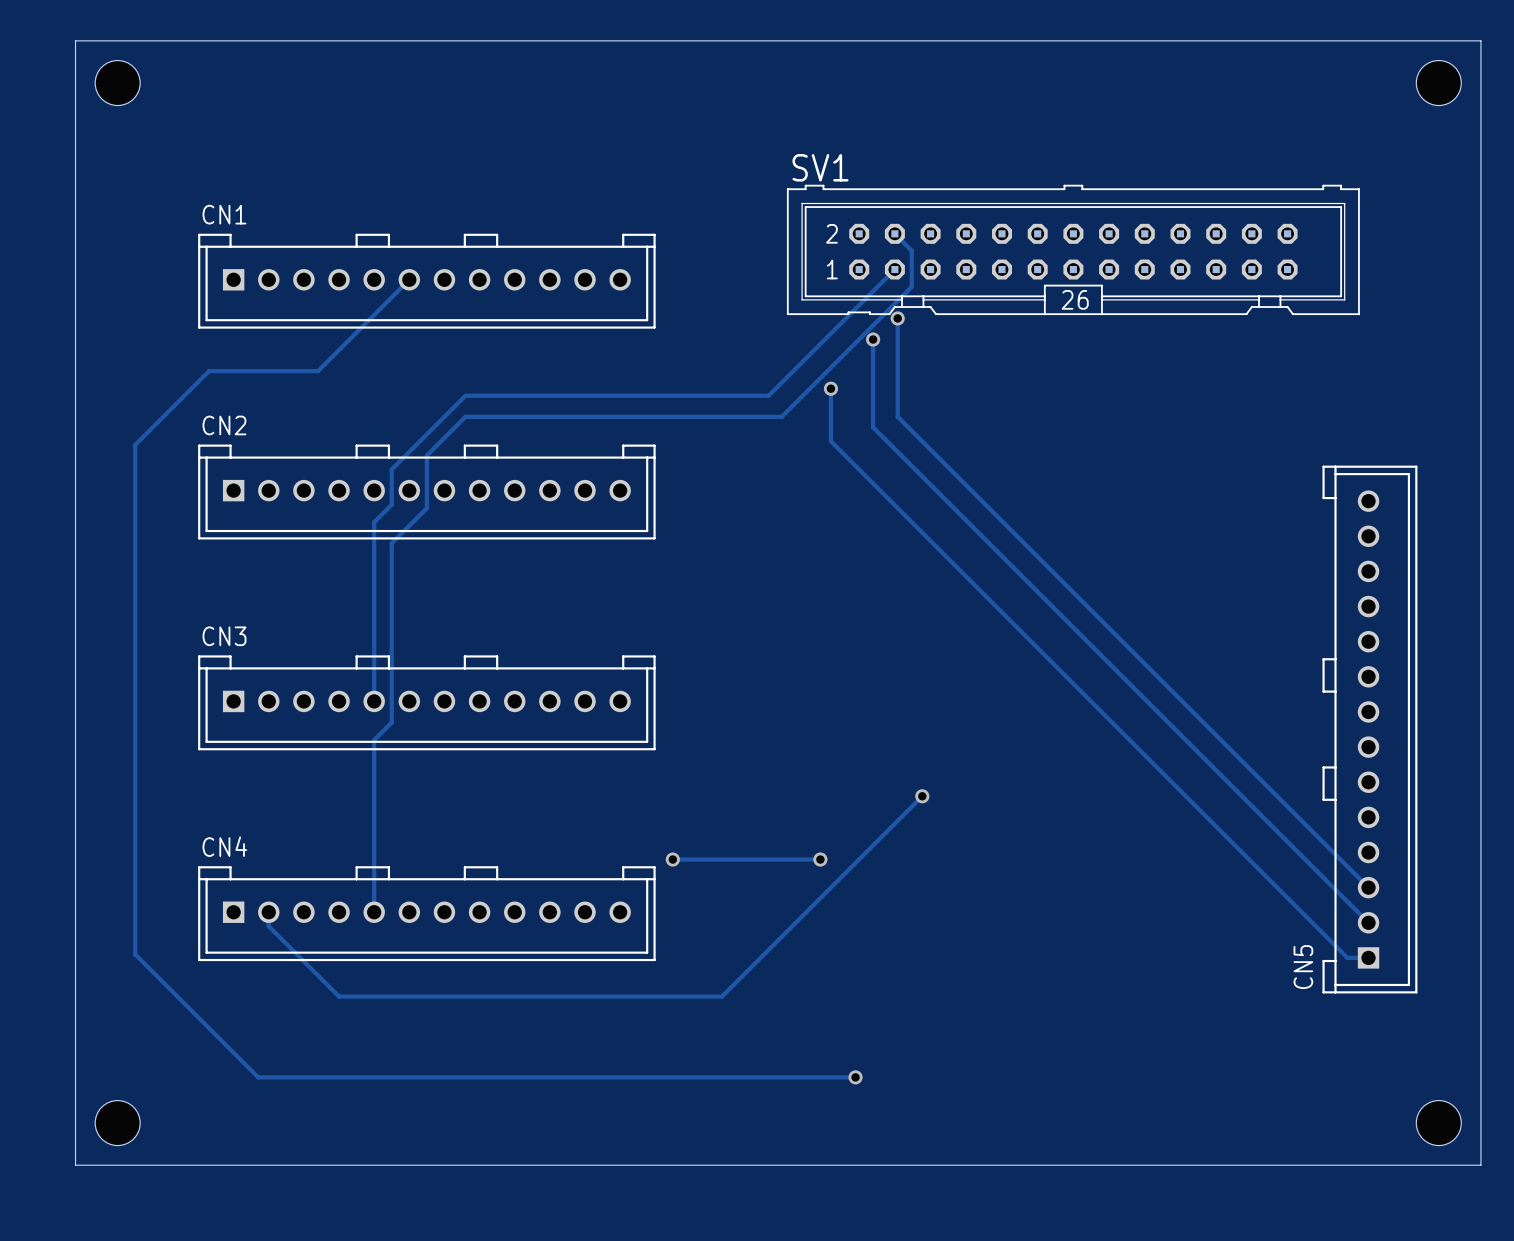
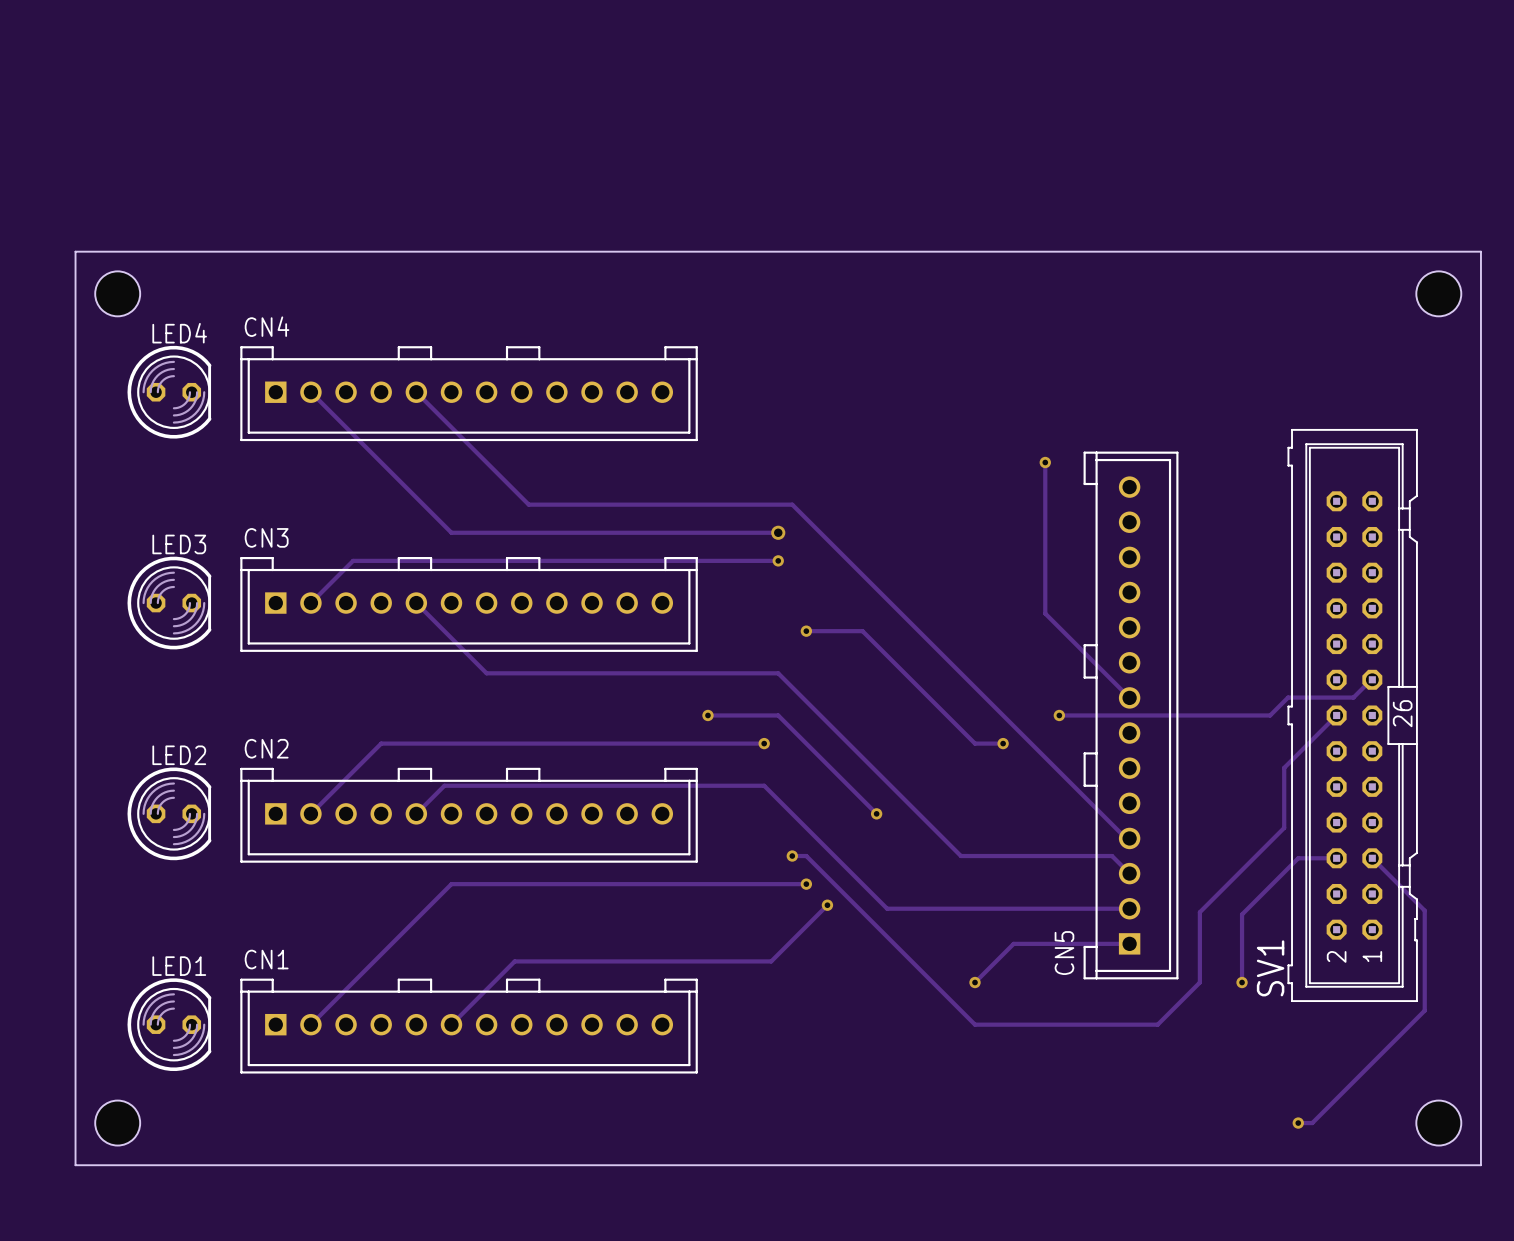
hole position: (117, 83) -> (117, 293)
hole position: (1438, 83) -> (1438, 293)
track: (894, 233) (911, 250) (911, 286) (781, 416) (465, 416) (426, 455) (426, 508) (391, 543) (391, 722) (374, 740) (374, 912) -> none
SV1 rotation: 0° (1073, 249) -> 90° counterclockwise (1352, 715)
SV1 position: (1073, 249) -> (1352, 715)
board edge: (75, 251) (75, 40) (1480, 40) (1480, 251) -> (75, 251) (1480, 251)
track: (894, 269) (768, 395) (465, 395) (391, 469) (391, 504) (374, 522) (374, 701) -> none
track: (409, 279) (317, 371) (209, 371) (135, 444) (135, 954) (258, 1077) (855, 1077) -> none
CN1 position: (426, 281) -> (469, 1026)
track: (897, 318) (897, 416) (1368, 887) -> none
via: (897, 318) -> none
track: (873, 339) (873, 427) (1368, 922) -> none
via: (873, 339) -> none
track: (830, 388) (830, 441) (1347, 957) (1368, 957) -> none
via: (830, 388) -> none
LED4: none -> (169, 392)
track: none -> (310, 392) (451, 532) (778, 532)
track: none -> (416, 392) (528, 504) (792, 504) (1126, 838) (1129, 838)
track: none -> (1045, 462) (1045, 613) (1129, 697)
via: none -> (1045, 462)
CN2 position: (426, 492) -> (469, 815)
via: none -> (778, 532)
track: none -> (778, 560) (353, 560) (310, 603)
via: none -> (778, 560)
LED3: none -> (169, 603)
track: none -> (416, 603) (486, 673) (778, 673) (960, 856) (1112, 856) (1129, 873)
track: none -> (806, 631) (862, 631) (975, 743) (1003, 743)
via: none -> (806, 631)
track: none -> (1372, 679) (1353, 697) (1288, 697) (1270, 715) (1059, 715)
CN3 position: (426, 702) -> (469, 604)
track: none -> (707, 715) (778, 715) (876, 813)
via: none -> (707, 715)
via: none -> (1059, 715)
track: none -> (1336, 715) (1284, 767) (1284, 827) (1199, 912) (1199, 982) (1157, 1024) (975, 1024) (806, 856) (792, 856)
CN5 position: (1369, 729) -> (1131, 715)
track: none -> (764, 743) (381, 743) (310, 813)
via: none -> (764, 743)
via: none -> (1003, 743)
track: (922, 796) (722, 996) (339, 996) (268, 926) (268, 912) -> none
via: (922, 796) -> none
LED2: none -> (169, 813)
track: none -> (416, 813) (444, 785) (764, 785) (887, 908) (1129, 908)
via: none -> (876, 813)
via: none -> (792, 856)
track: none -> (1336, 858) (1298, 858) (1242, 914) (1242, 982)
track: none -> (1372, 858) (1424, 910) (1424, 1010) (1312, 1123) (1298, 1123)
track: (672, 859) (820, 859) -> none
via: (672, 859) -> none
via: (820, 859) -> none
track: none -> (806, 884) (451, 884) (310, 1024)
via: none -> (806, 884)
track: none -> (827, 905) (771, 961) (514, 961) (451, 1024)
via: none -> (827, 905)
CN4 position: (426, 913) -> (469, 393)
track: none -> (1129, 943) (1013, 943) (975, 982)
via: none -> (975, 982)
via: none -> (1242, 982)
LED1: none -> (169, 1024)
via: (855, 1077) -> none
via: none -> (1298, 1123)

